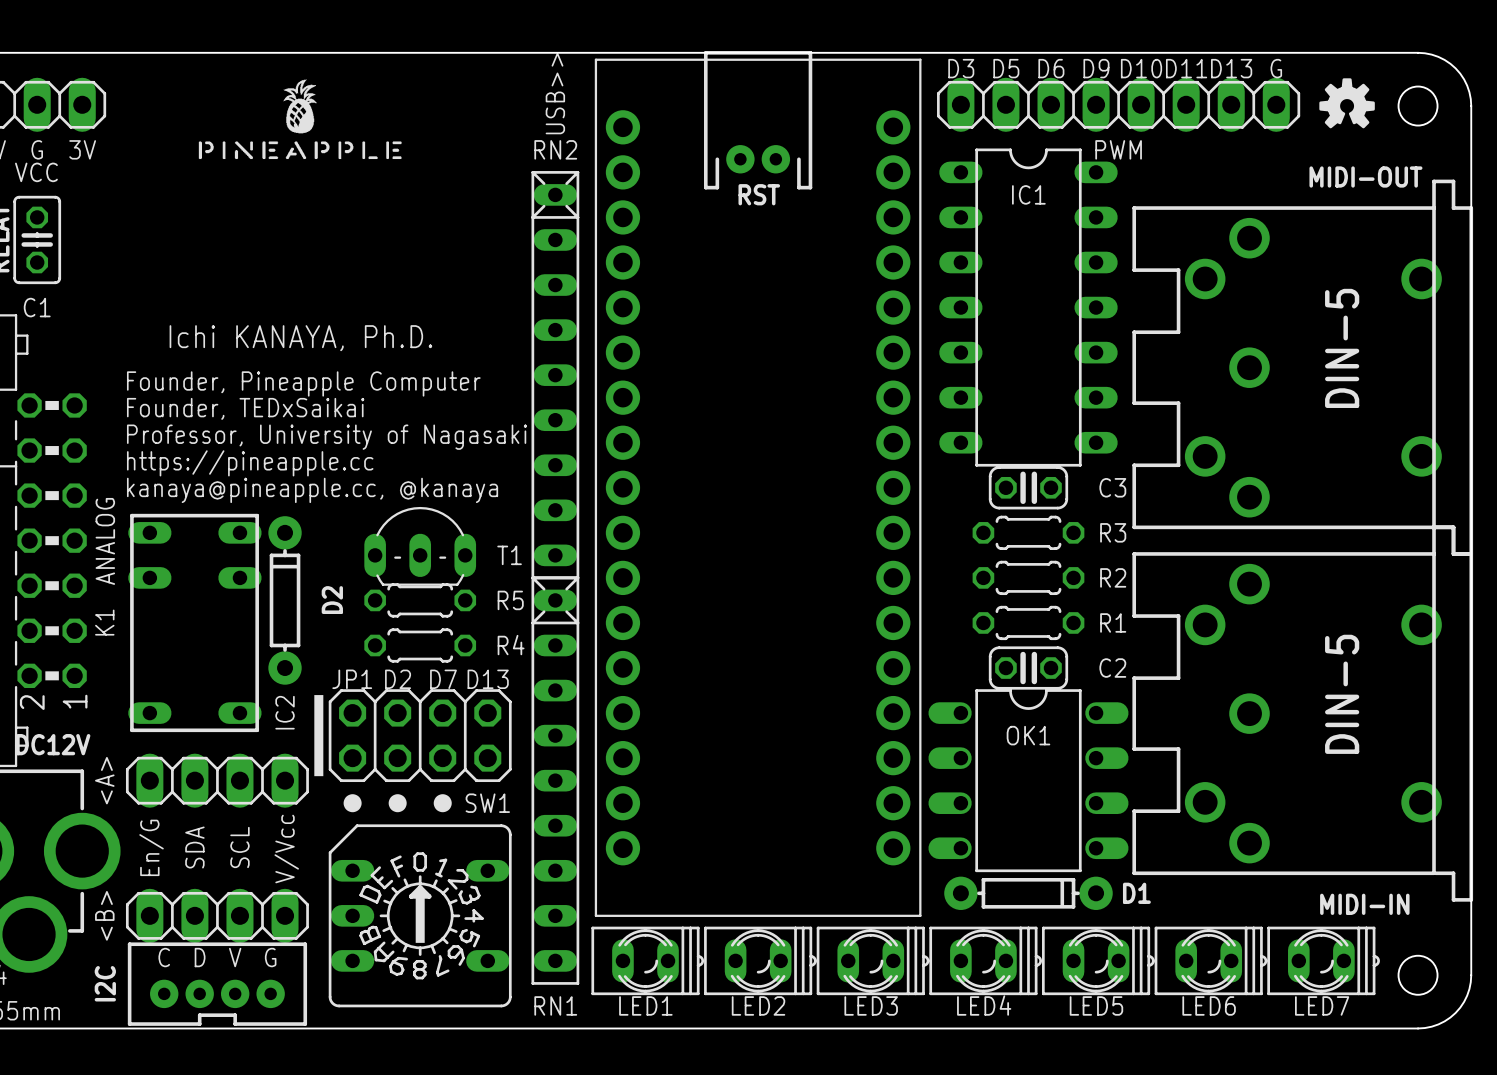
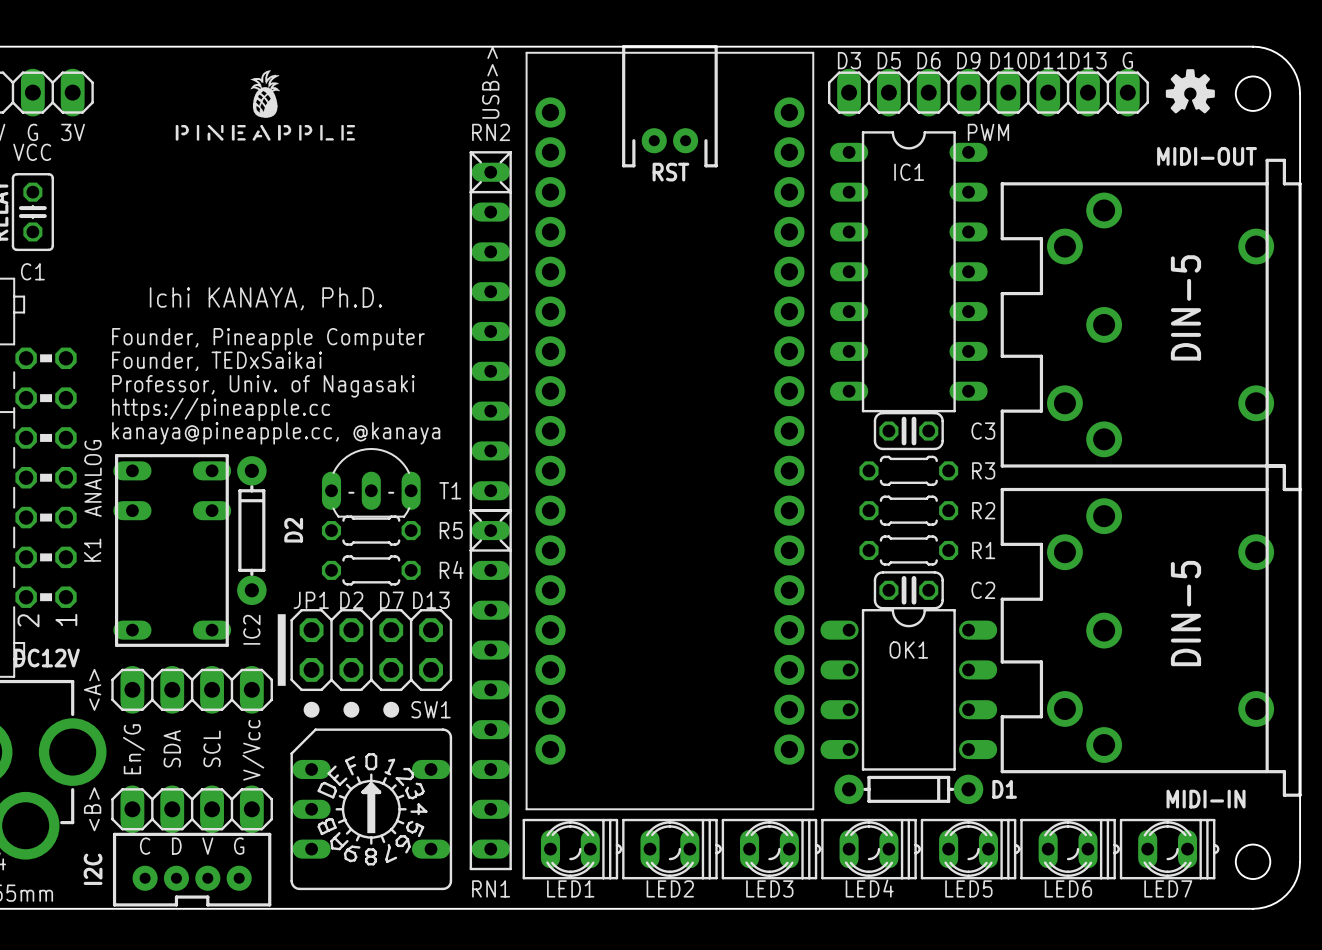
text: Professor, University of Nagasaki (326, 437) -> Professor, Univ. of Nagasaki (263, 386)

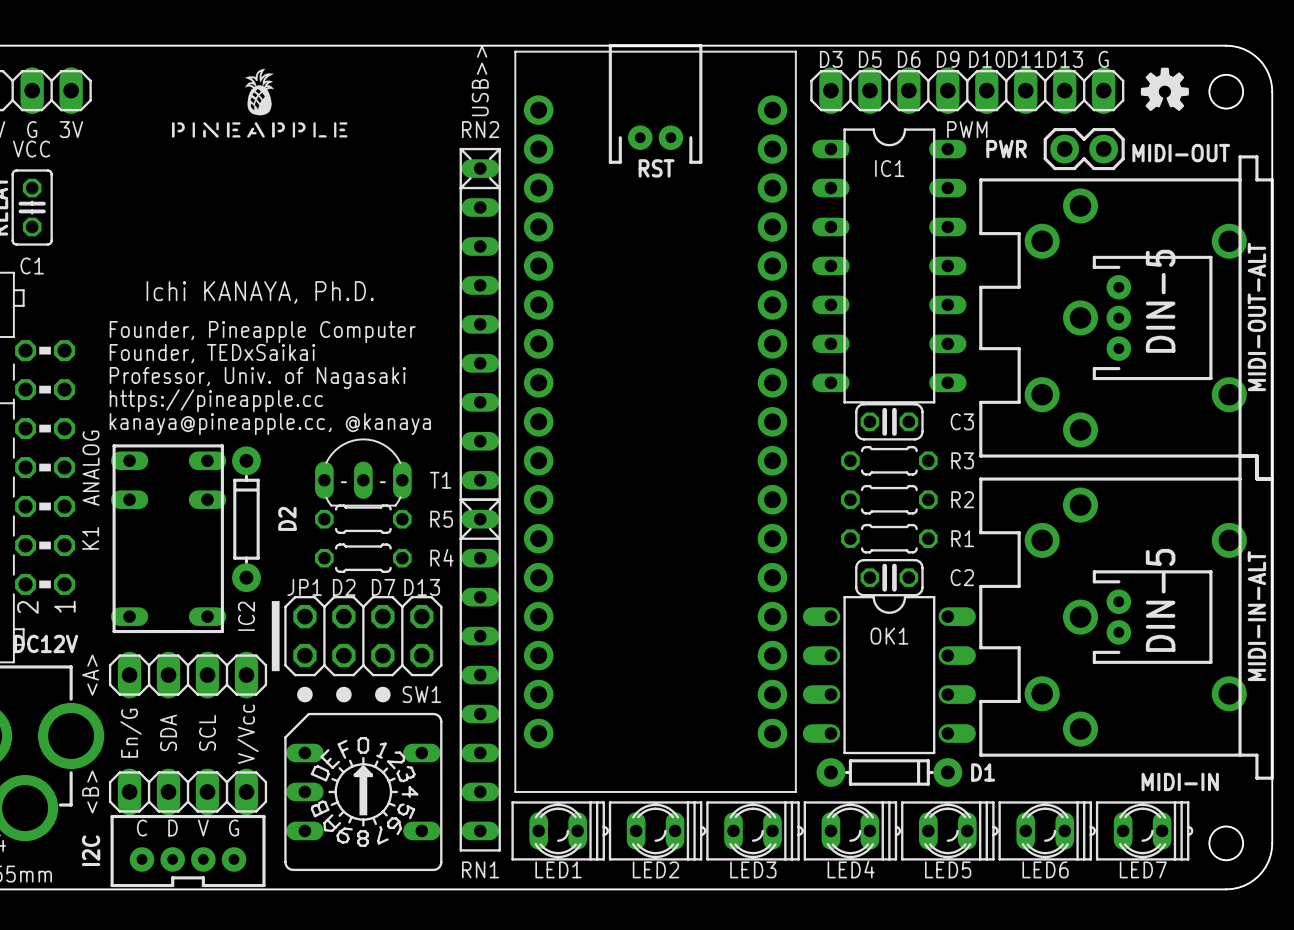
PWR: none -> (1084, 149)
MIDI-OUT-ALT: none -> (1152, 317)
MIDI-IN-ALT: none -> (1152, 617)

